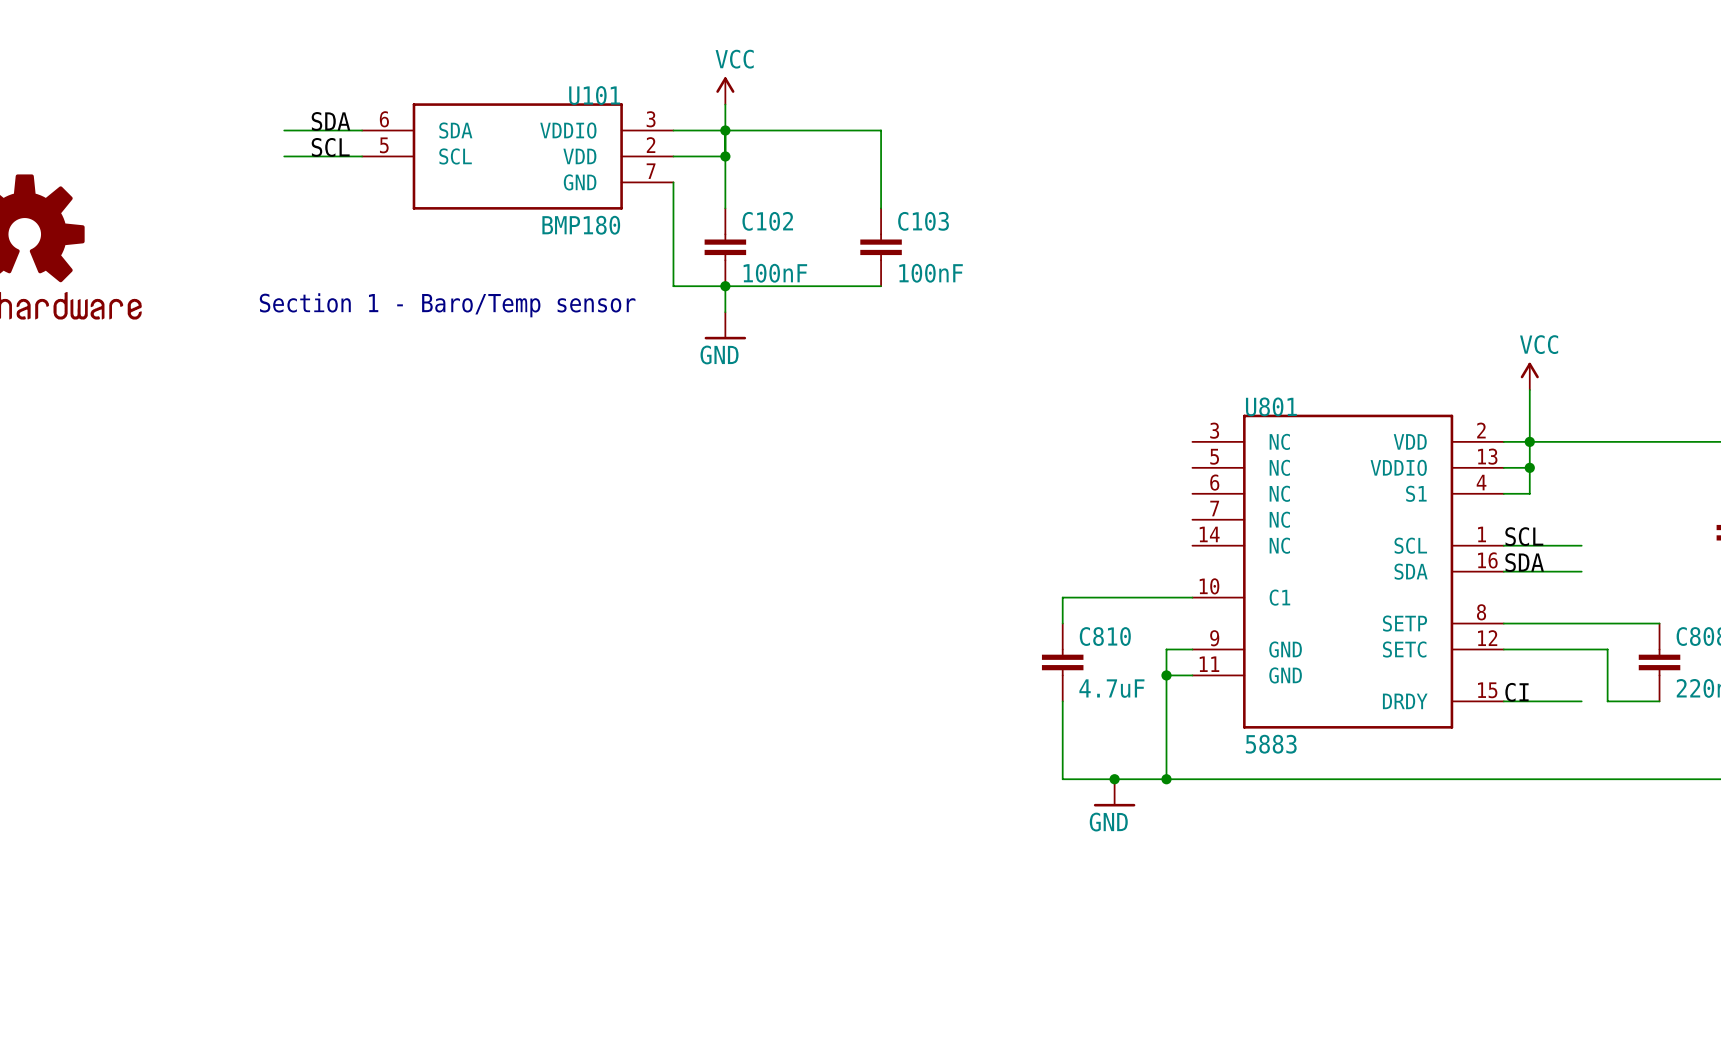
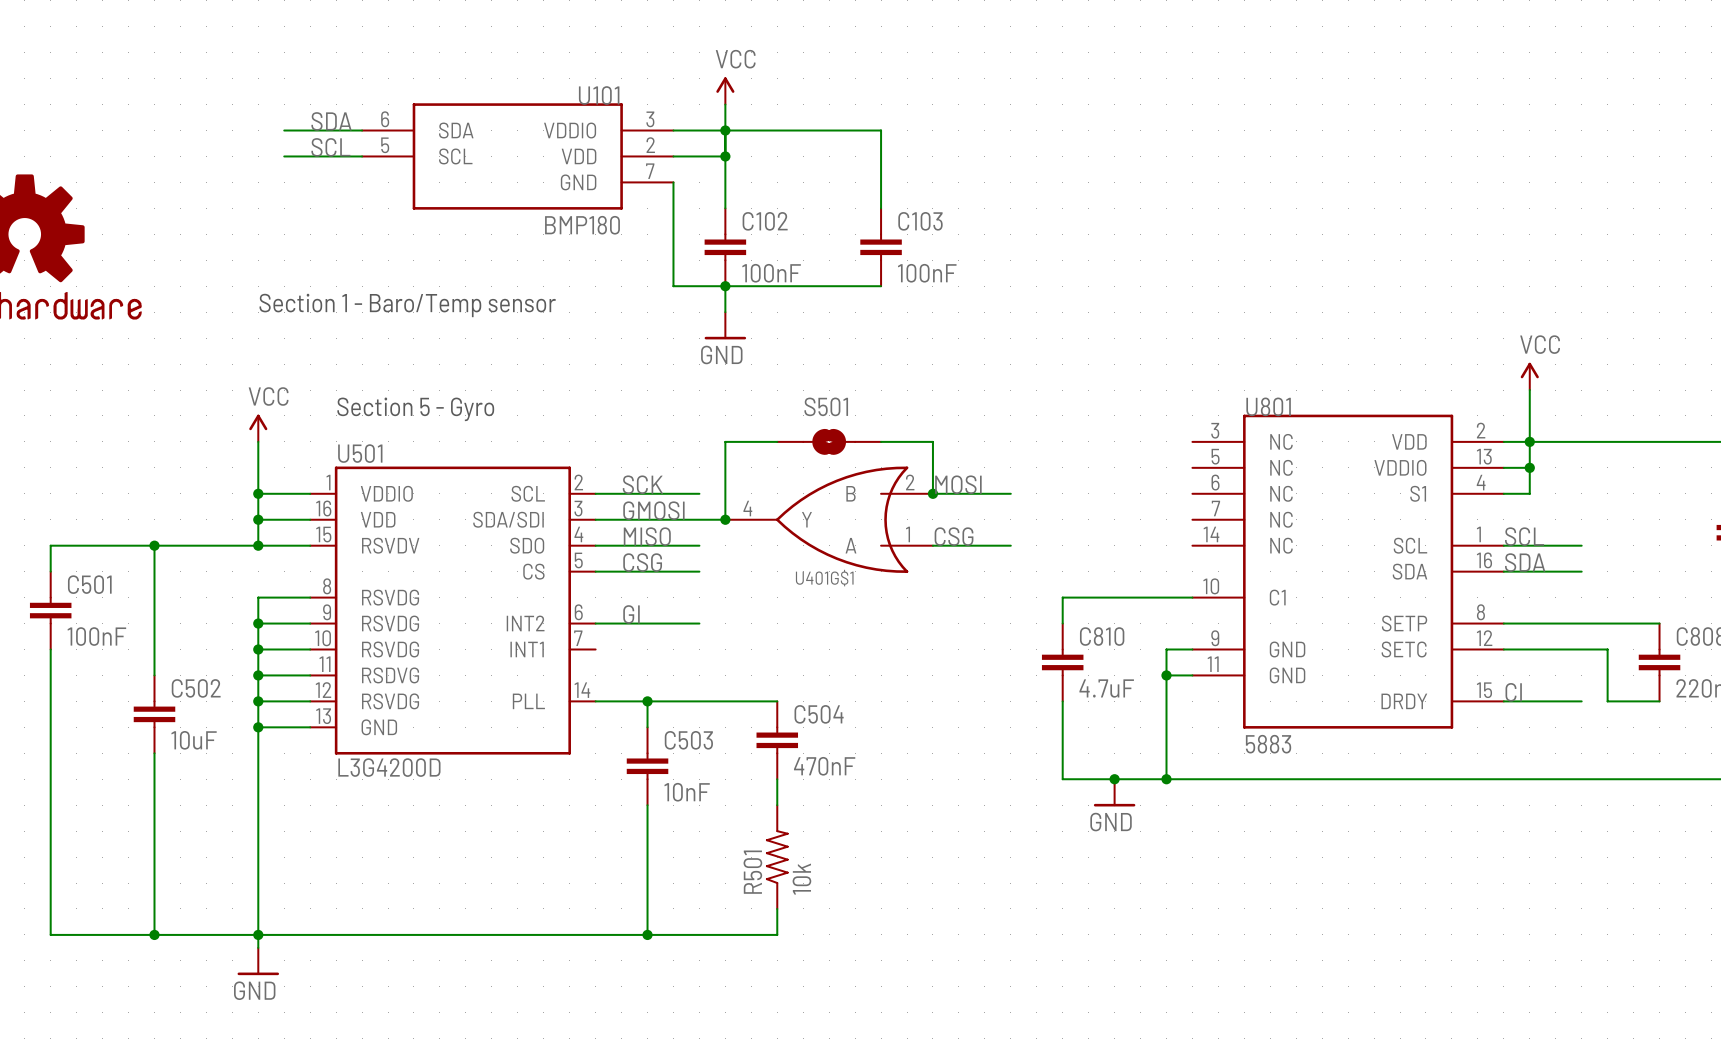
text: none -> Section 5 - Gyro (415, 409)
power symbol: none -> VCC (258, 428)
wire: none -> (258, 441) (258, 545)
wire: none -> (777, 441) (725, 441) (725, 519) (595, 519)
S501: none -> (829, 441)
wire: none -> (881, 441) (932, 441) (932, 493) (1010, 493)
label: none -> SCK (642, 484)
label: none -> MOSI (958, 484)
wire: none -> (258, 493) (310, 493)
junction: none -> (258, 493)
wire: none -> (595, 493) (699, 493)
junction: none -> (932, 493)
label: none -> GMOSI (653, 510)
wire: none -> (258, 519) (310, 519)
junction: none -> (258, 519)
junction: none -> (725, 519)
U401G$1: none -> (829, 519)
label: none -> MISO (647, 536)
label: none -> CSG (954, 536)
wire: none -> (154, 545) (154, 675)
junction: none -> (154, 545)
junction: none -> (258, 545)
wire: none -> (310, 545) (50, 545) (50, 571)
wire: none -> (595, 545) (699, 545)
wire: none -> (932, 545) (1010, 545)
label: none -> CSG (642, 562)
wire: none -> (595, 571) (699, 571)
wire: none -> (310, 597) (258, 597) (258, 947)
C501: none -> 100nF (50, 610)
U501: none -> L3G4200D (452, 610)
label: none -> GI (631, 614)
wire: none -> (258, 623) (310, 623)
junction: none -> (258, 623)
wire: none -> (595, 623) (699, 623)
wire: none -> (50, 649) (50, 934) (777, 934) (777, 908)
wire: none -> (258, 649) (310, 649)
junction: none -> (258, 649)
wire: none -> (258, 675) (310, 675)
junction: none -> (258, 675)
wire: none -> (258, 701) (310, 701)
junction: none -> (258, 701)
wire: none -> (595, 701) (777, 701)
wire: none -> (647, 701) (647, 727)
junction: none -> (647, 701)
C502: none -> 10uF (154, 714)
wire: none -> (258, 727) (310, 727)
junction: none -> (258, 727)
C504: none -> 470nF (777, 740)
wire: none -> (154, 753) (154, 934)
C503: none -> 10nF (647, 766)
wire: none -> (777, 779) (777, 805)
wire: none -> (647, 805) (647, 934)
R501: none -> 10k (777, 857)
junction: none -> (154, 934)
junction: none -> (258, 934)
junction: none -> (647, 934)
power symbol: none -> GND (258, 961)

